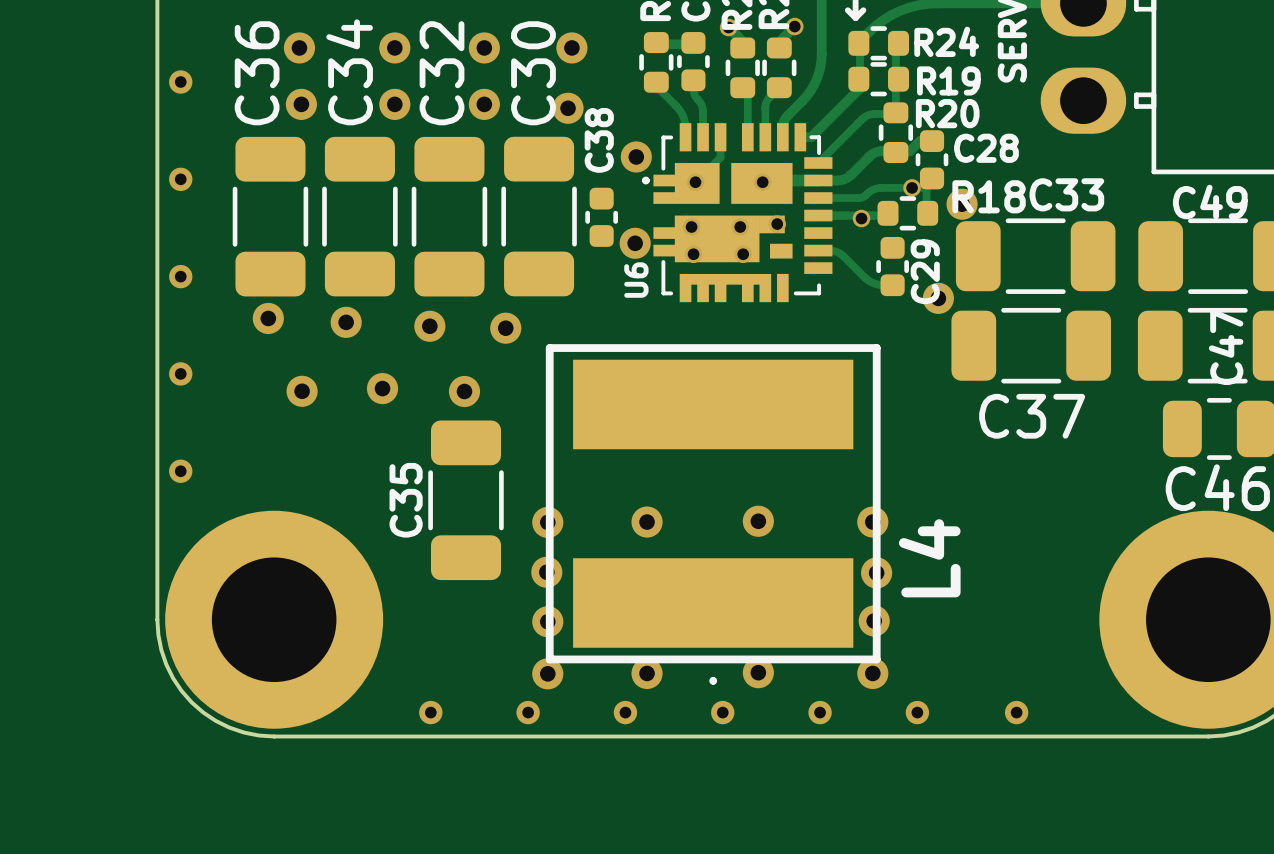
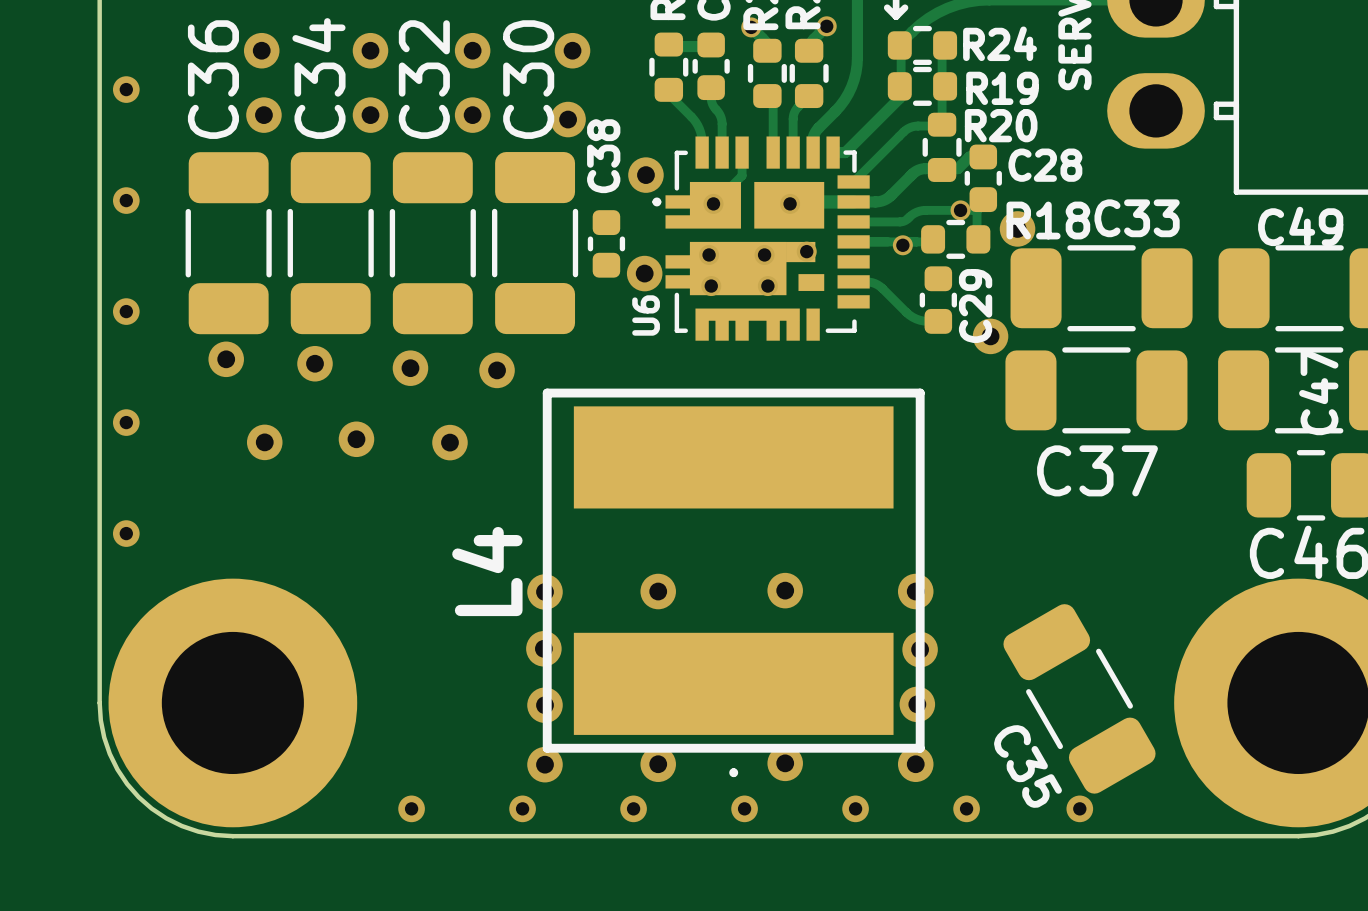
C35 rotation: 0° (466, 500) -> 30° counterclockwise (1079, 698)
C35 position: (466, 500) -> (1079, 698)
L4 name position: L4 (929, 558) -> L4 (487, 571)

